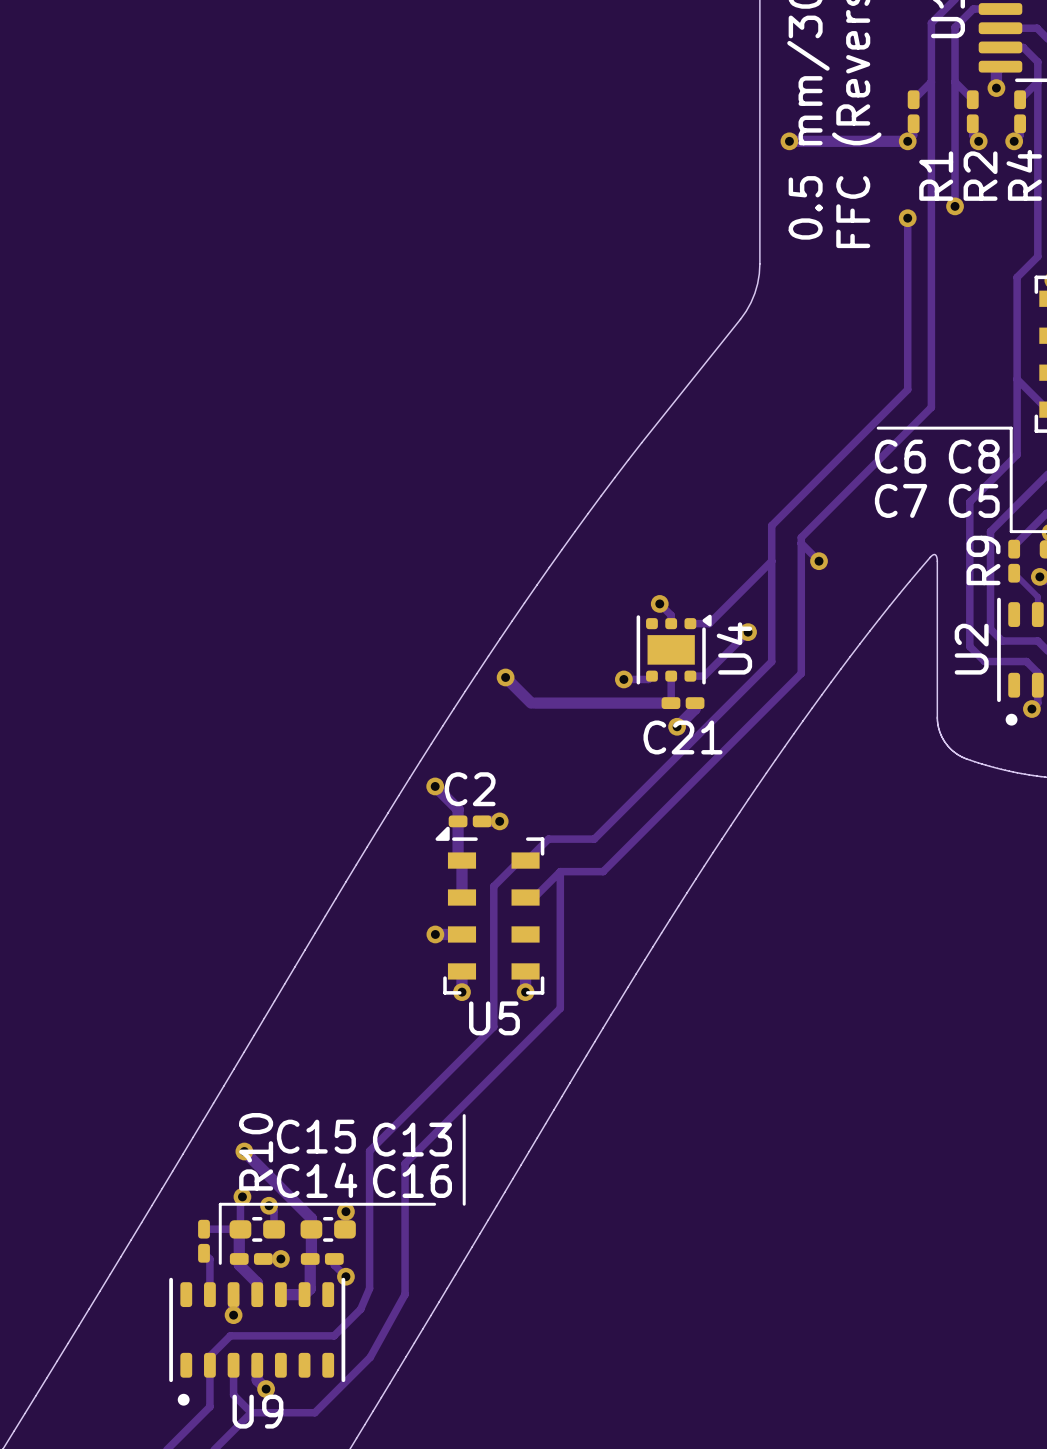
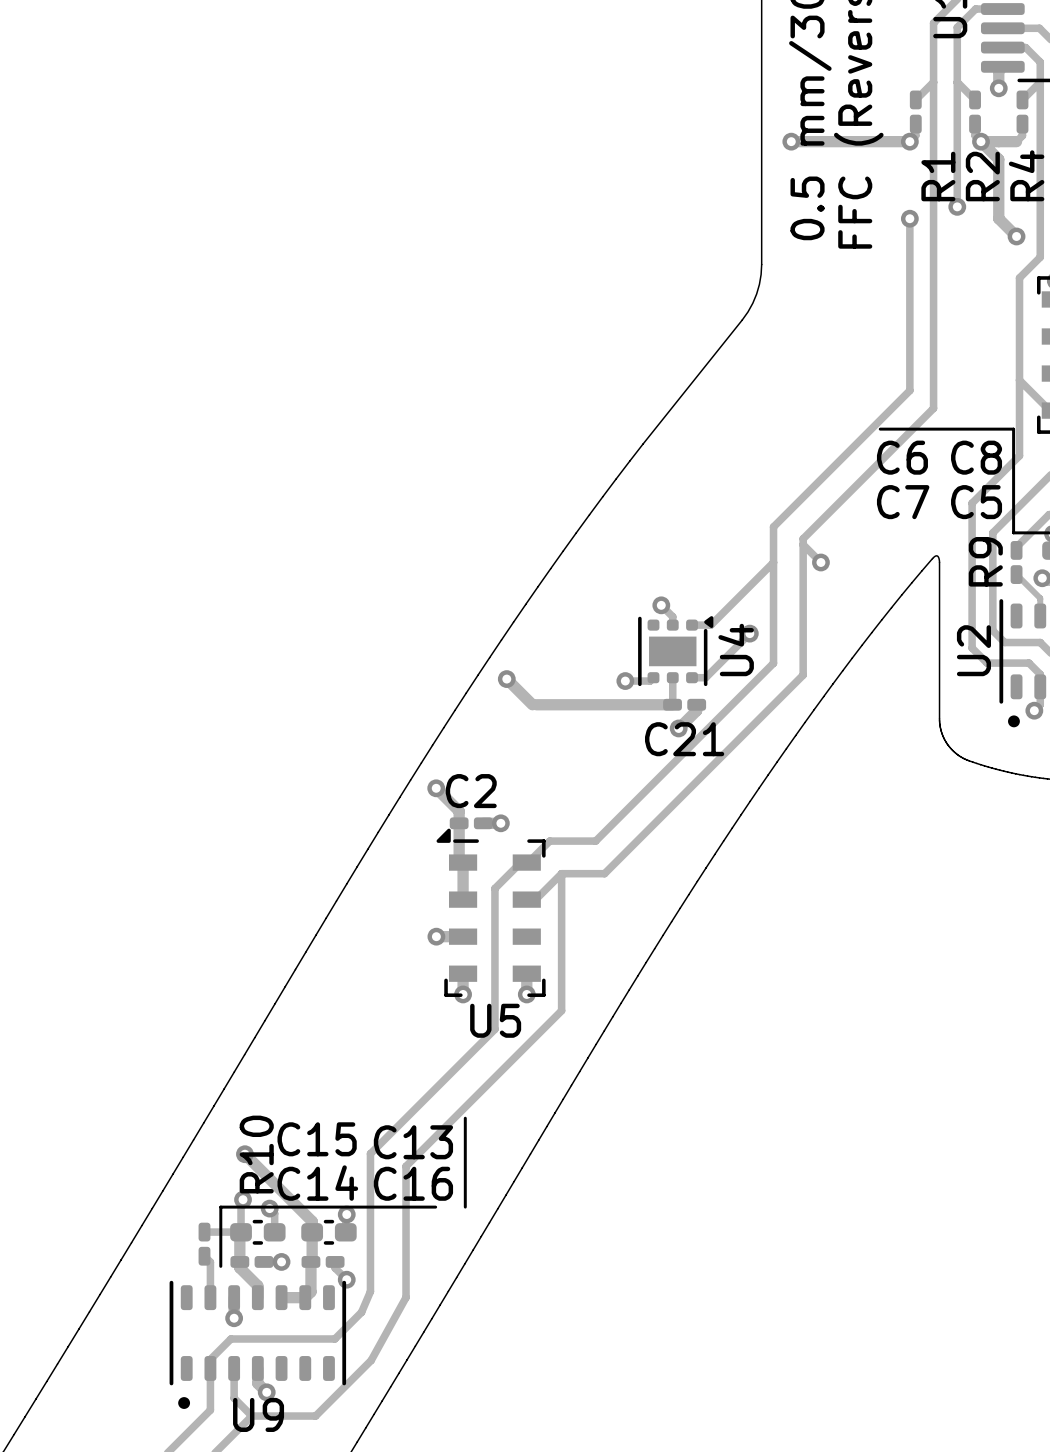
track: none -> (1016, 141) (980, 141) (998, 159) (998, 218) (1016, 236)
via: (1014, 141) -> none
via: none -> (1016, 236)

